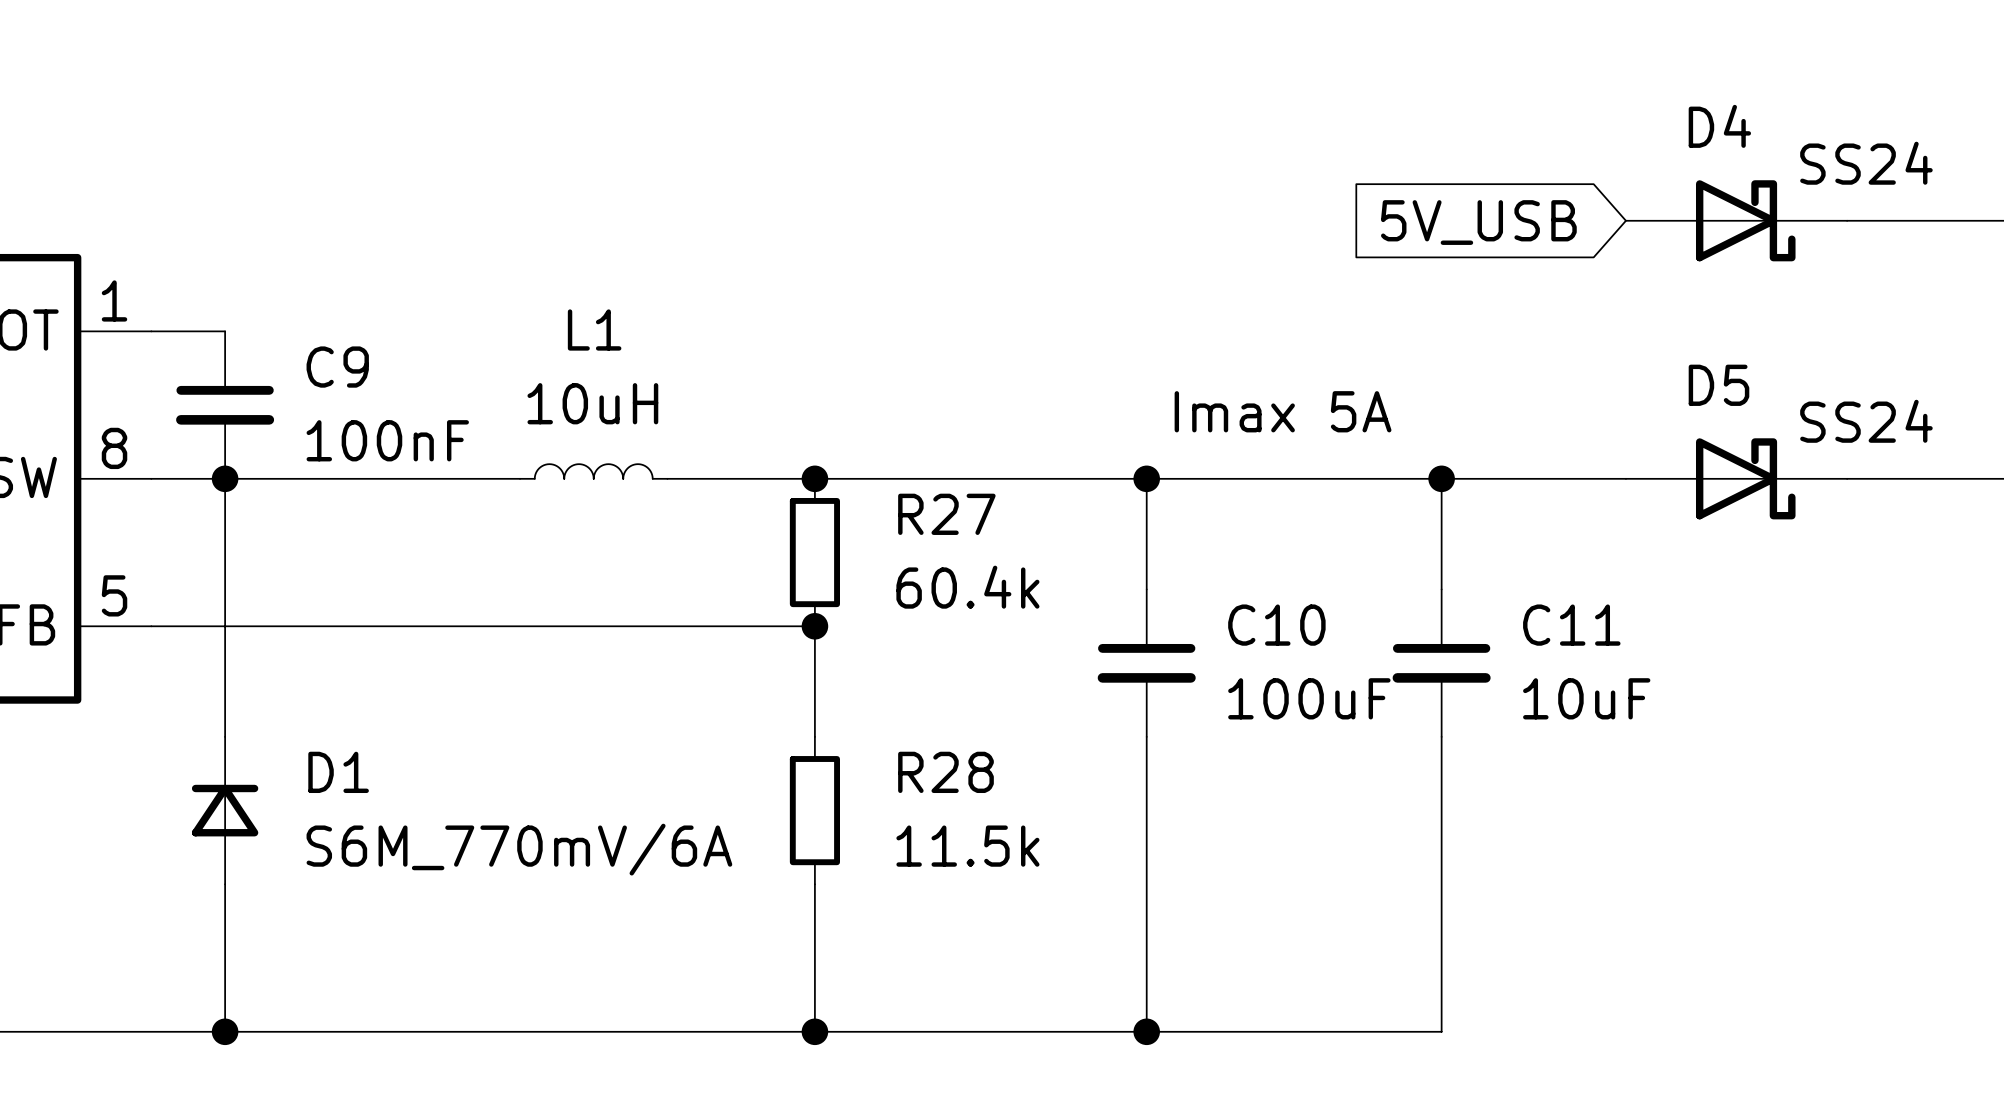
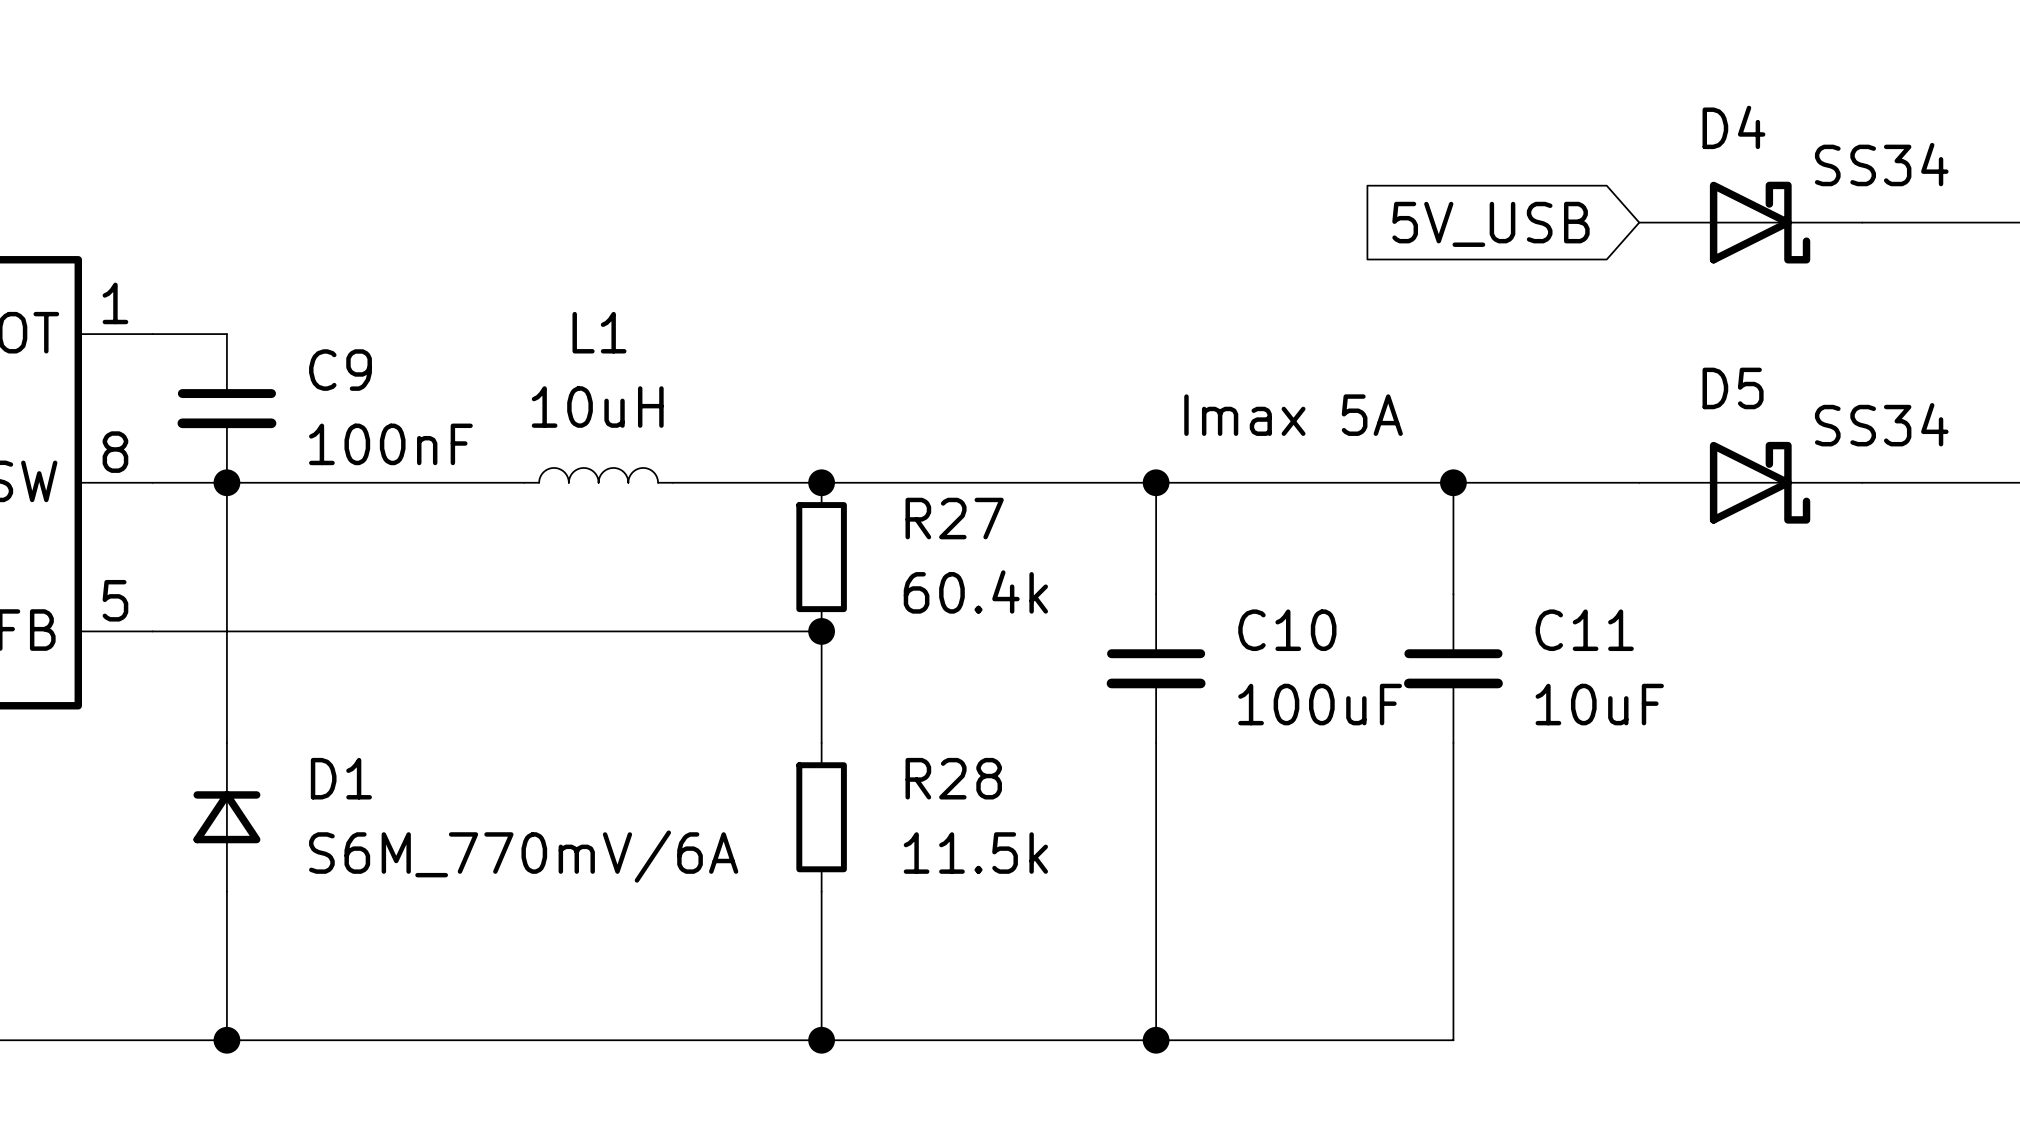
D4 value: SS24 (1866, 163) -> SS34 (1881, 164)
D5 value: SS24 (1866, 421) -> SS34 (1881, 424)

